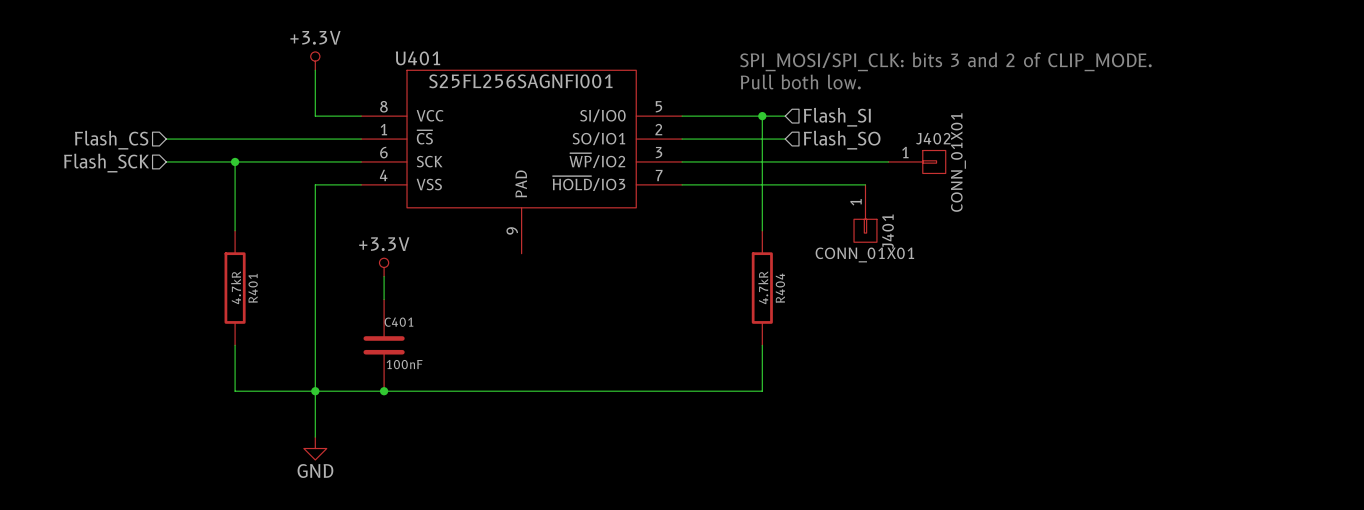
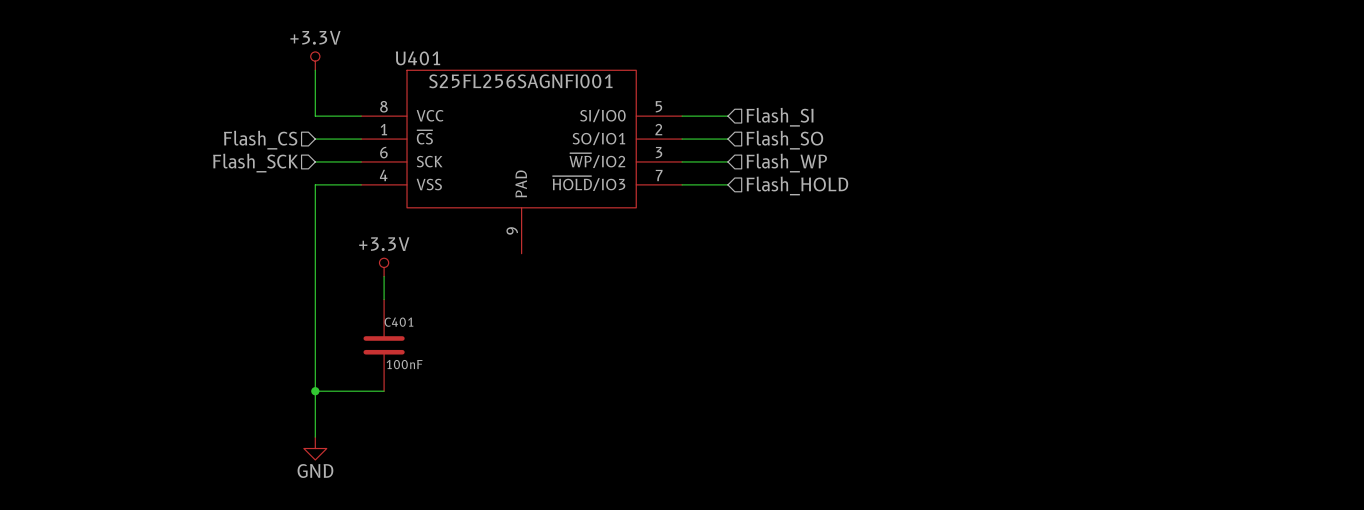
text: SPI_MOSI/SPI_CLK: bits 3 and 2 of CLIP_MODE. (945, 61) -> none
text: Pull both low. (800, 82) -> none
wire: (727, 116) (785, 116) -> none
wire: (762, 116) (762, 230) -> none
junction: (762, 116) -> none
hierarchical label position: Flash_SI (837, 117) -> Flash_SI (780, 117)
wire: (166, 139) (315, 139) -> none
wire: (727, 139) (785, 139) -> none
hierarchical label position: Flash_CS (111, 140) -> Flash_CS (260, 140)
hierarchical label position: Flash_SO (842, 140) -> Flash_SO (784, 140)
wire: (166, 161) (315, 161) -> none
wire: (235, 161) (235, 230) -> none
junction: (235, 161) -> none
wire: (727, 161) (888, 161) -> none
J402: CONN_01X01 (917, 161) -> none
hierarchical label position: Flash_SCK (106, 163) -> Flash_SCK (255, 163)
hierarchical label: none -> Flash_WP (786, 163)
wire: (727, 184) (865, 184) -> none
hierarchical label: none -> Flash_HOLD (797, 185)
J401: CONN_01X01 (865, 213) -> none
R401: 4.7kR (235, 288) -> none
R404: 4.7kR (762, 288) -> none
wire: (235, 345) (235, 391) (315, 391) -> none
wire: (762, 345) (762, 391) (384, 391) -> none
junction: (384, 391) -> none

